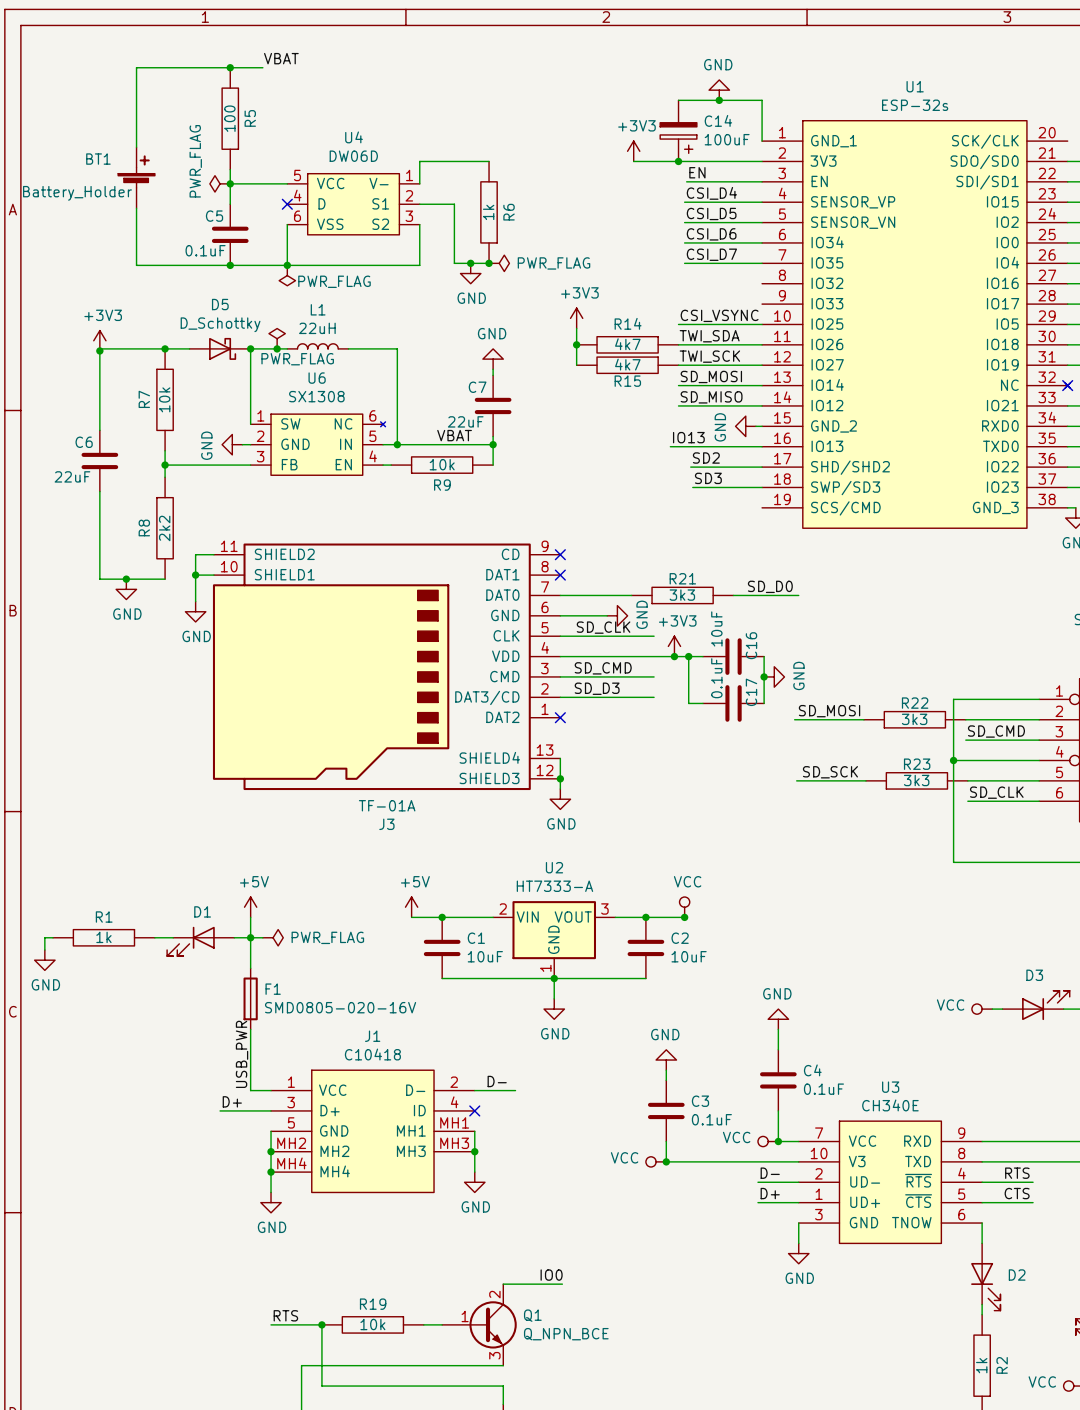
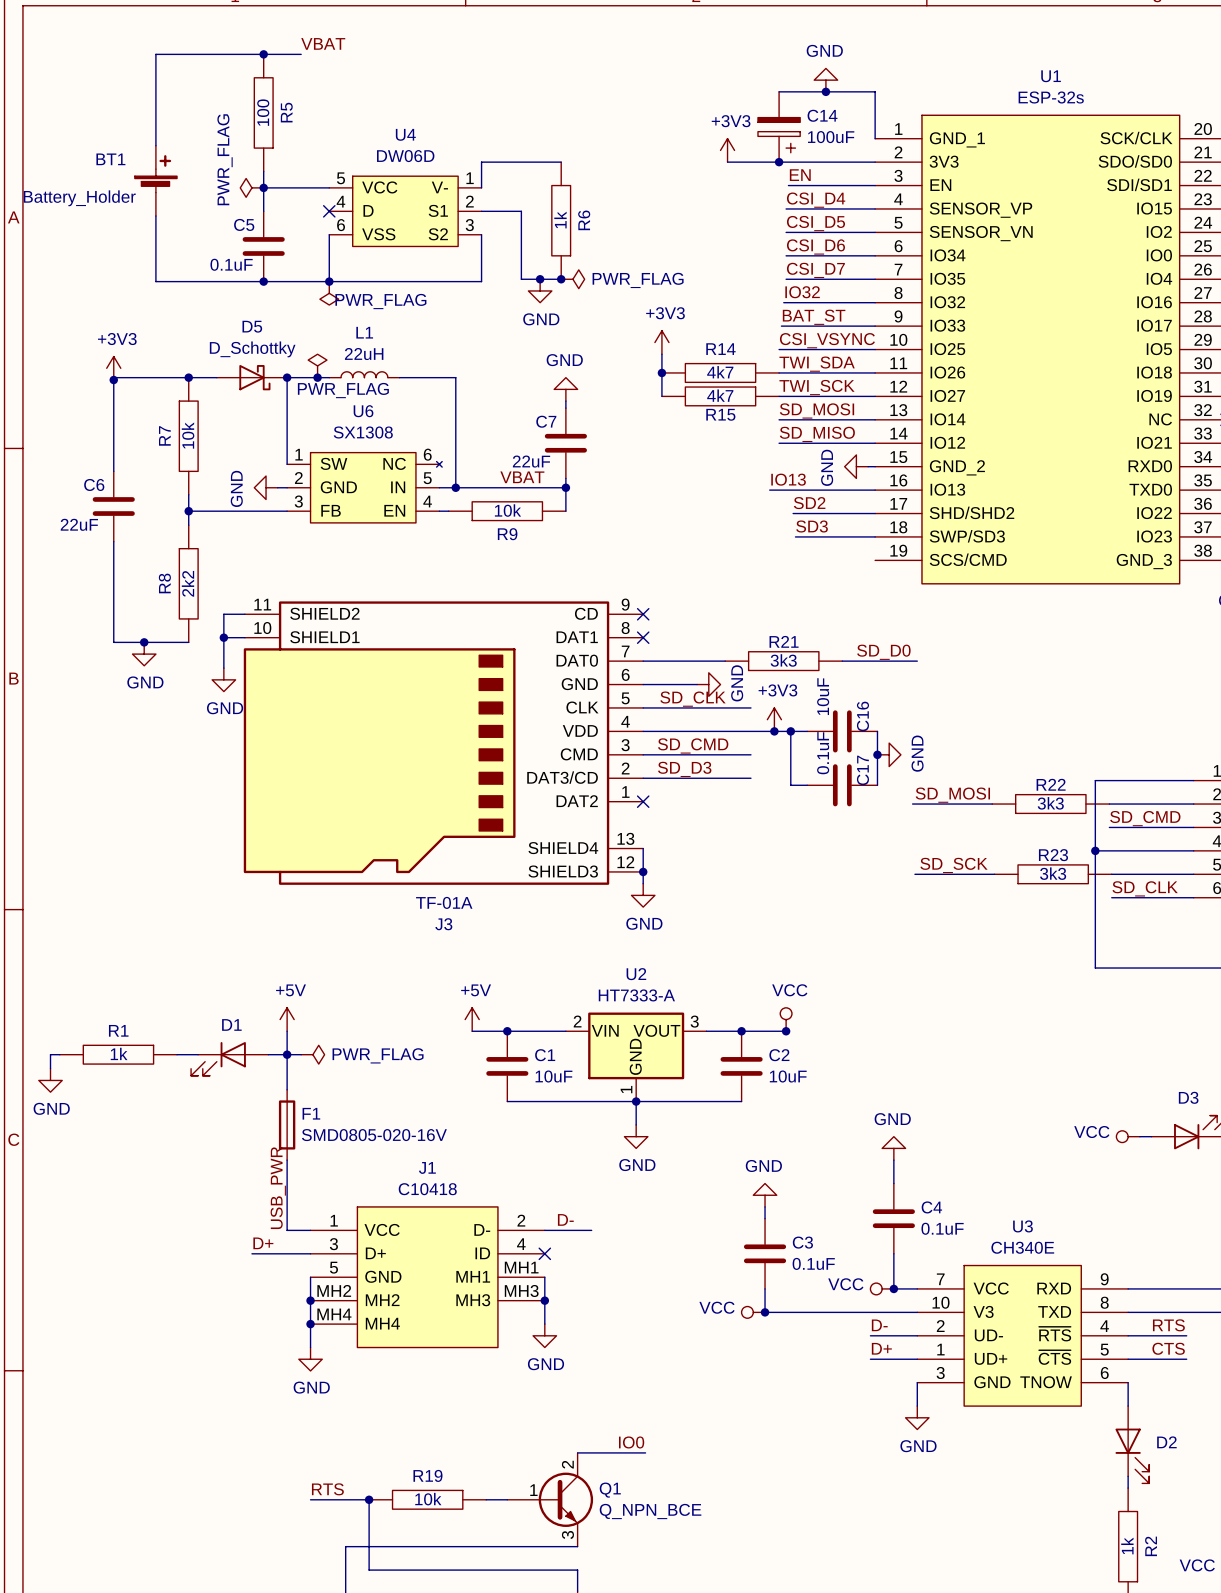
label: none -> IO32 (802, 292)
wire: none -> (783, 302) (875, 302)
label: none -> BAT_ST (814, 317)
wire: none -> (781, 326) (875, 326)

